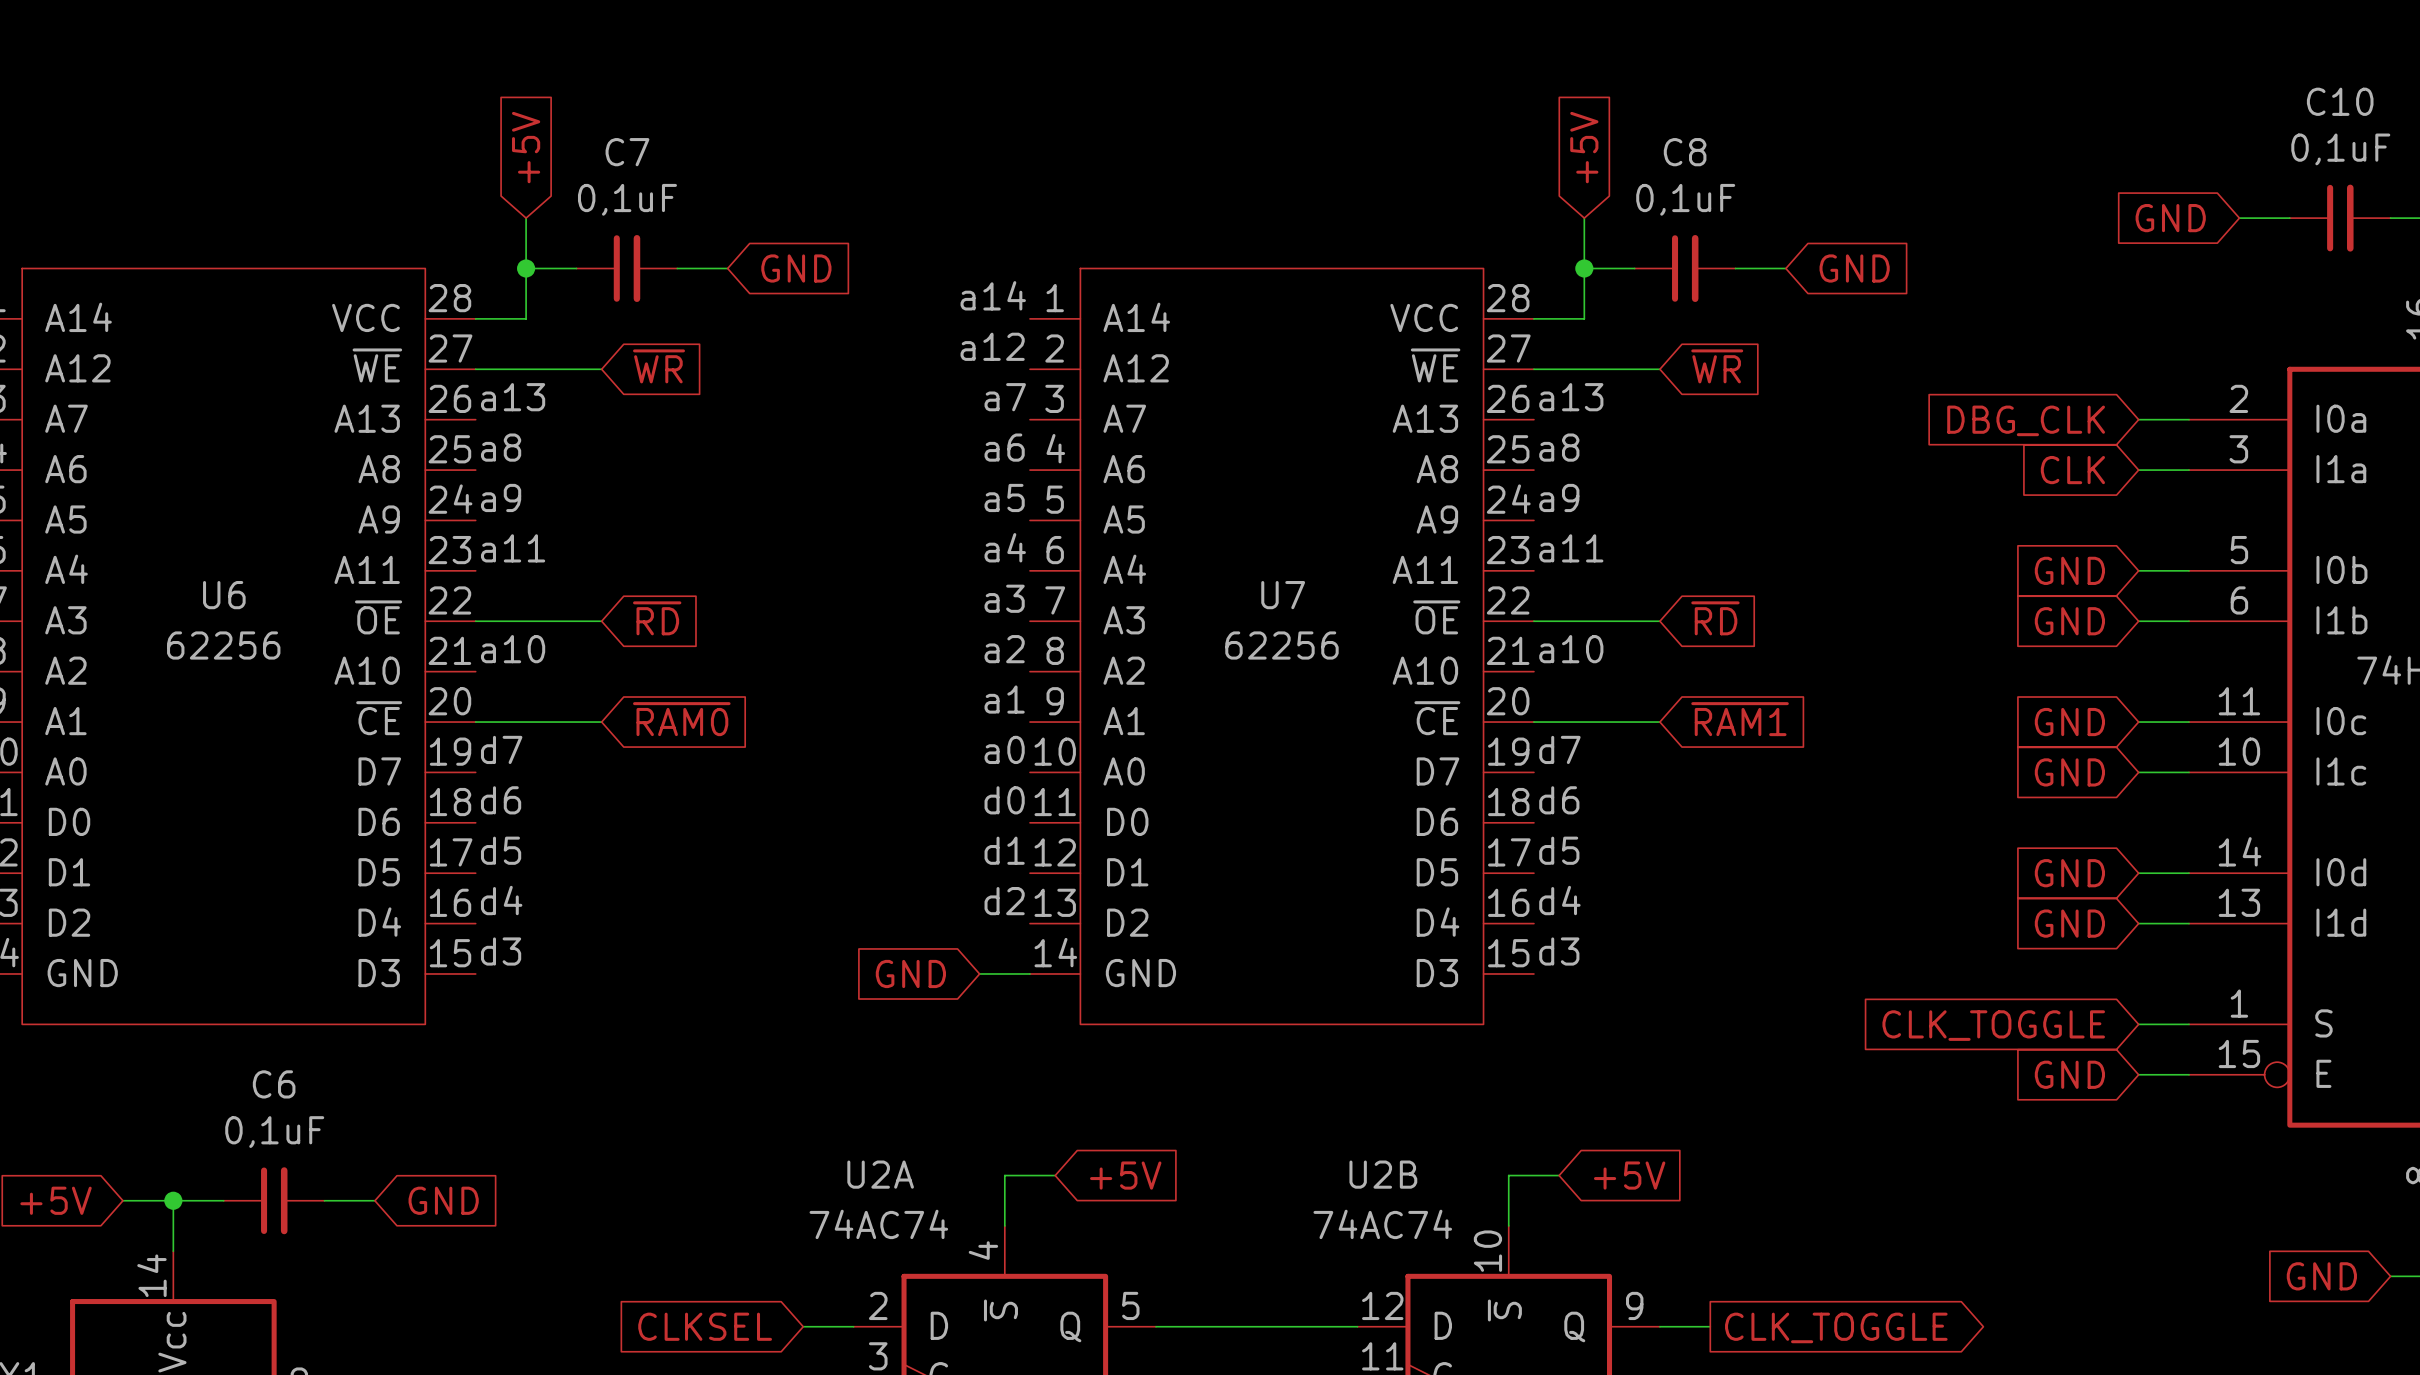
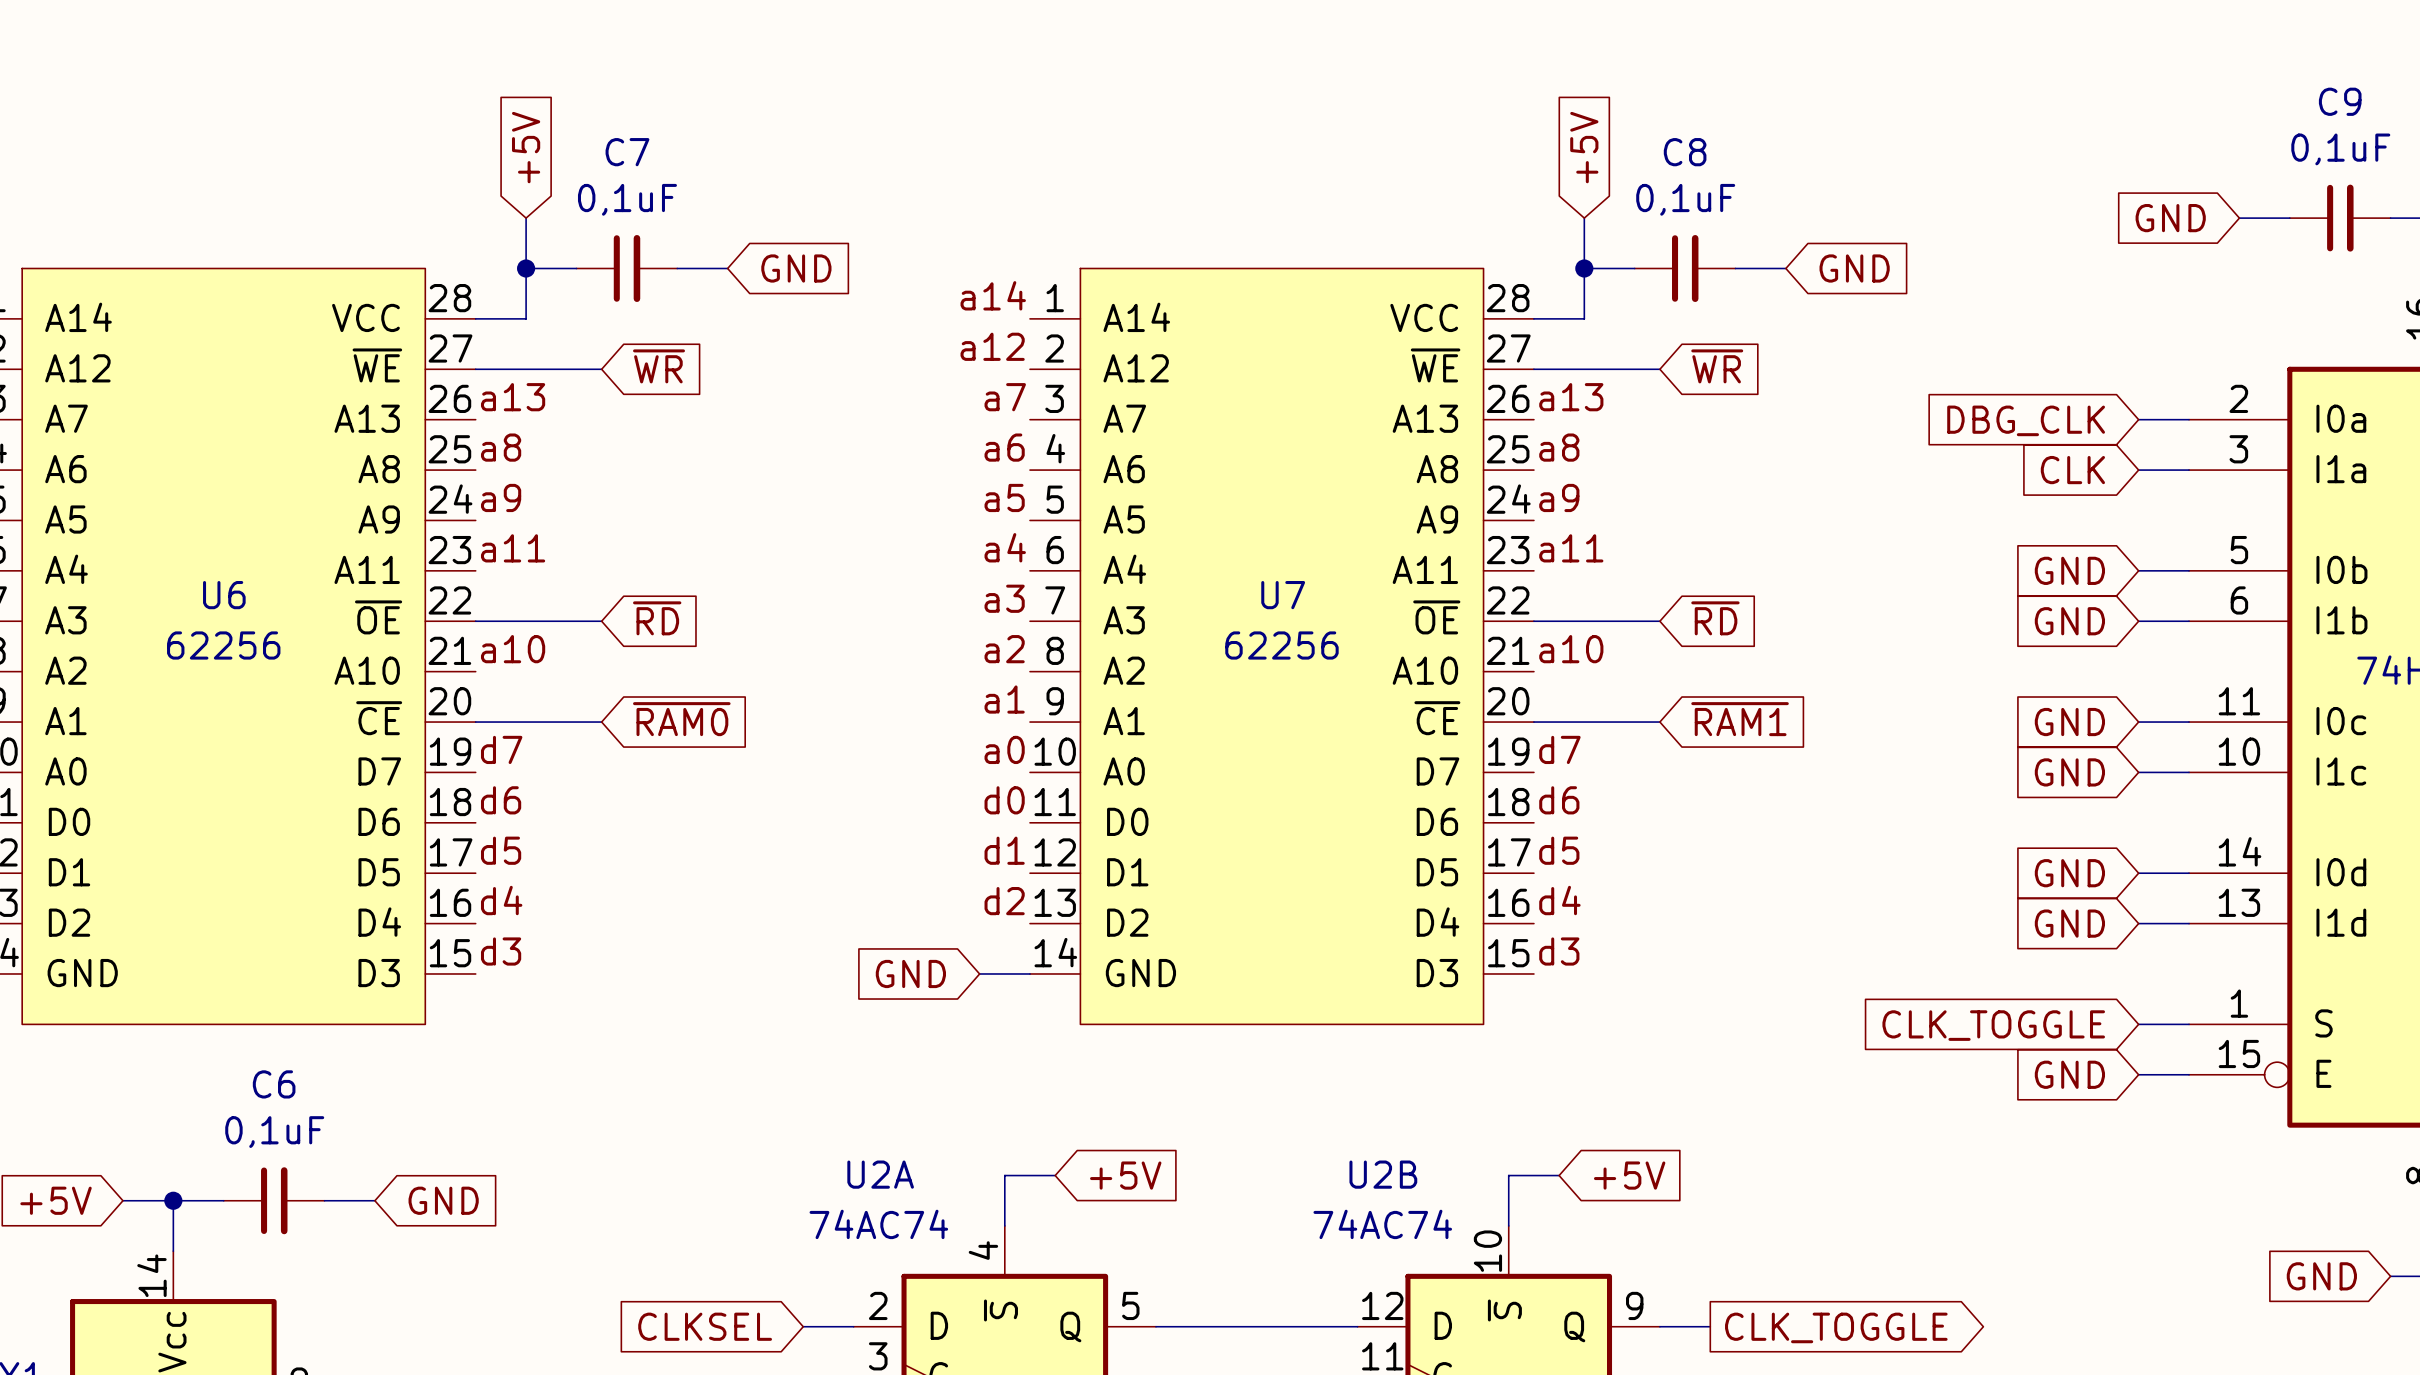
C10 name: C10 (2340, 101) -> C9 (2340, 101)

